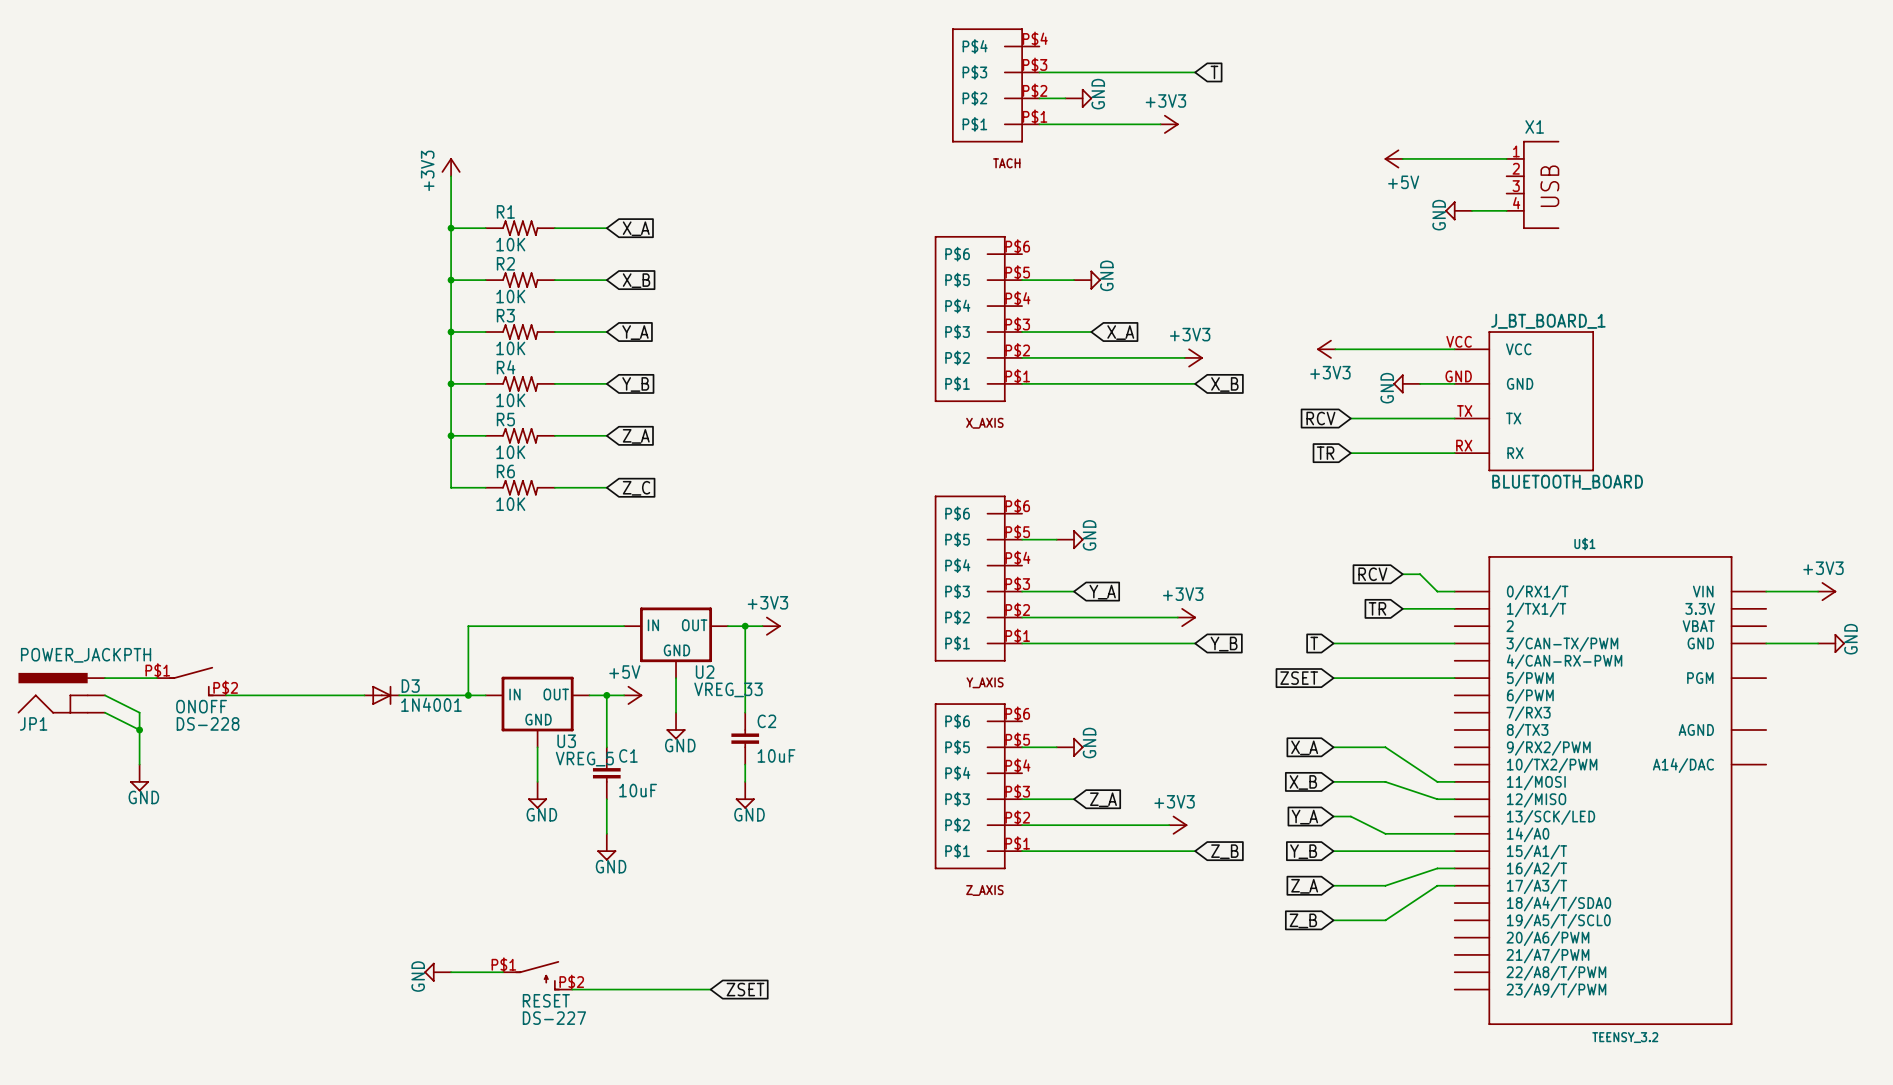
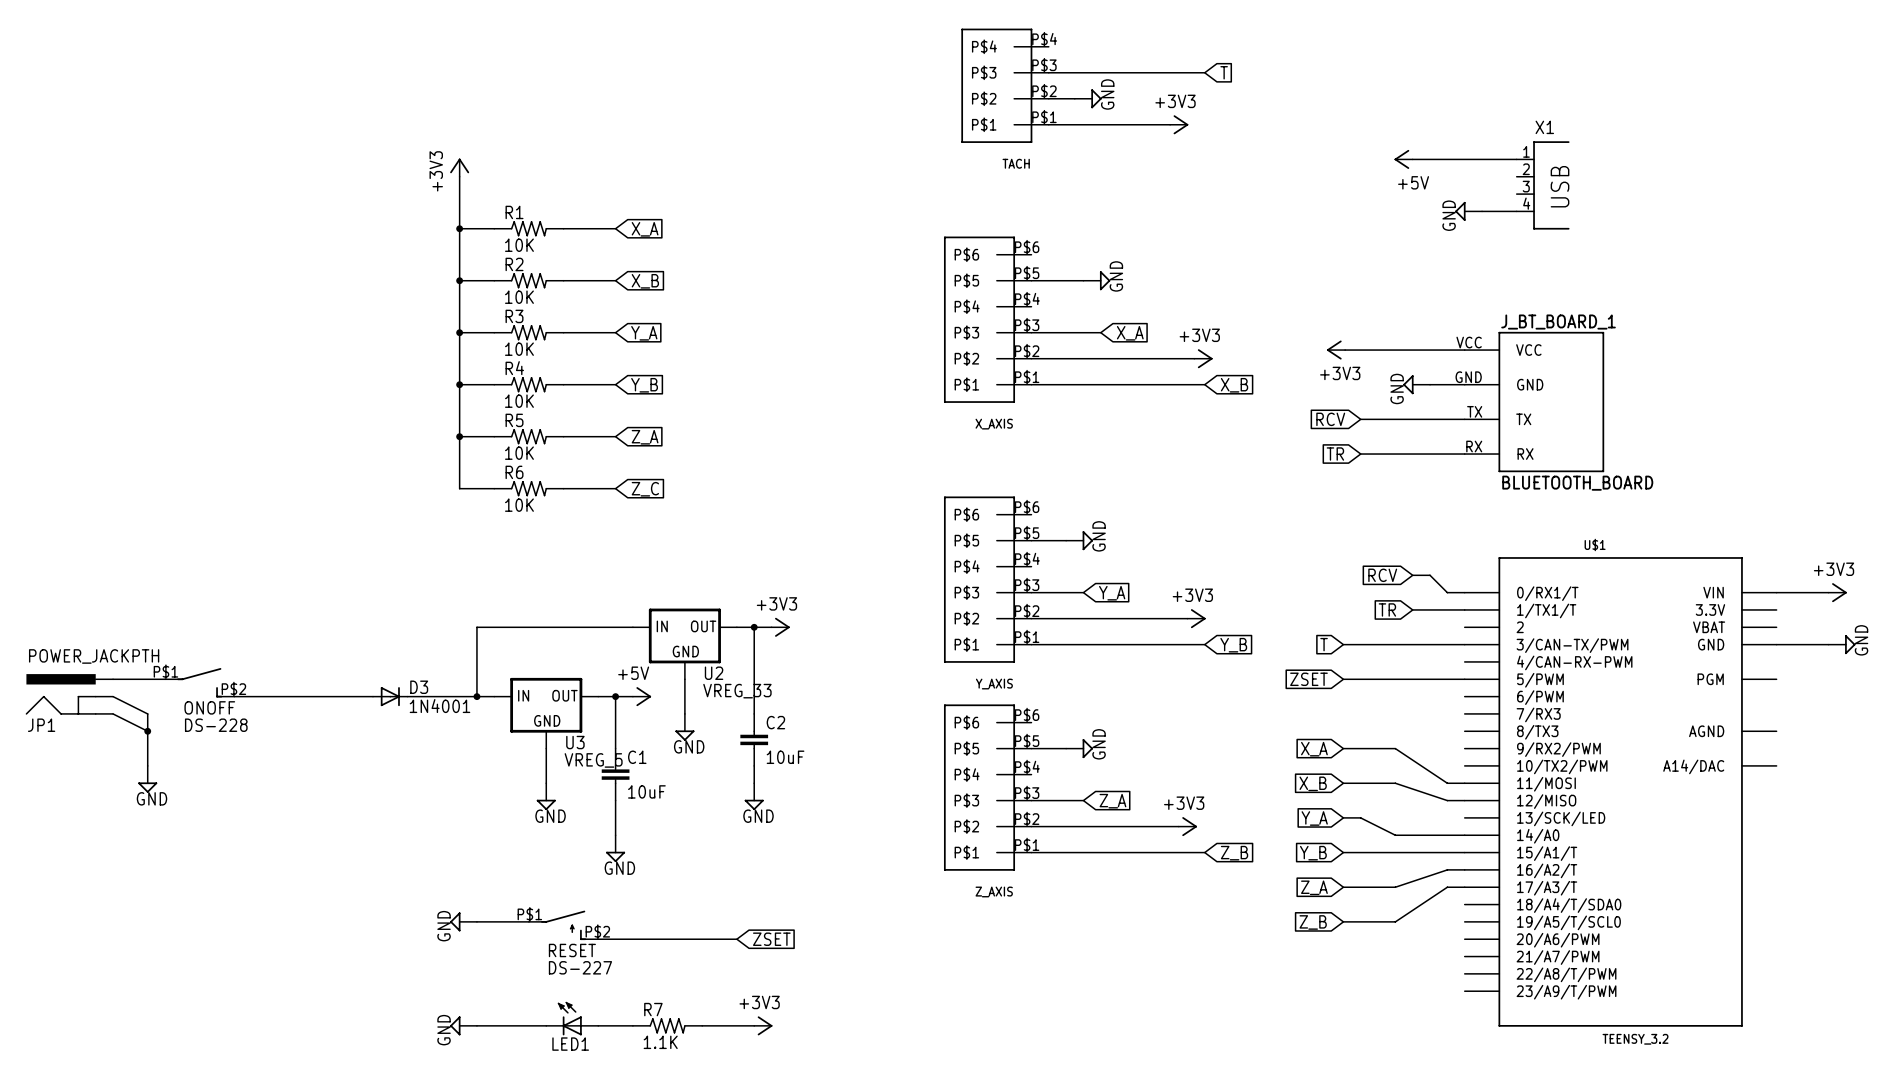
power symbol: none -> GND (463, 921)
power symbol: GND (437, 972) -> none
wire: (451, 972) (502, 972) -> (476, 921) (528, 921)
RESET position: (537, 975) -> (563, 925)
wire: (572, 989) (710, 989) -> (598, 939) (736, 939)
global label position: ZSET (745, 989) -> ZSET (771, 939)
LED1: none -> (572, 1018)
power symbol: none -> GND (463, 1025)
wire: none -> (476, 1025) (546, 1025)
wire: none -> (598, 1025) (632, 1025)
R7: none -> 1.1K (667, 1025)
wire: none -> (702, 1025) (754, 1025)
power symbol: none -> +3V3 (763, 1025)

